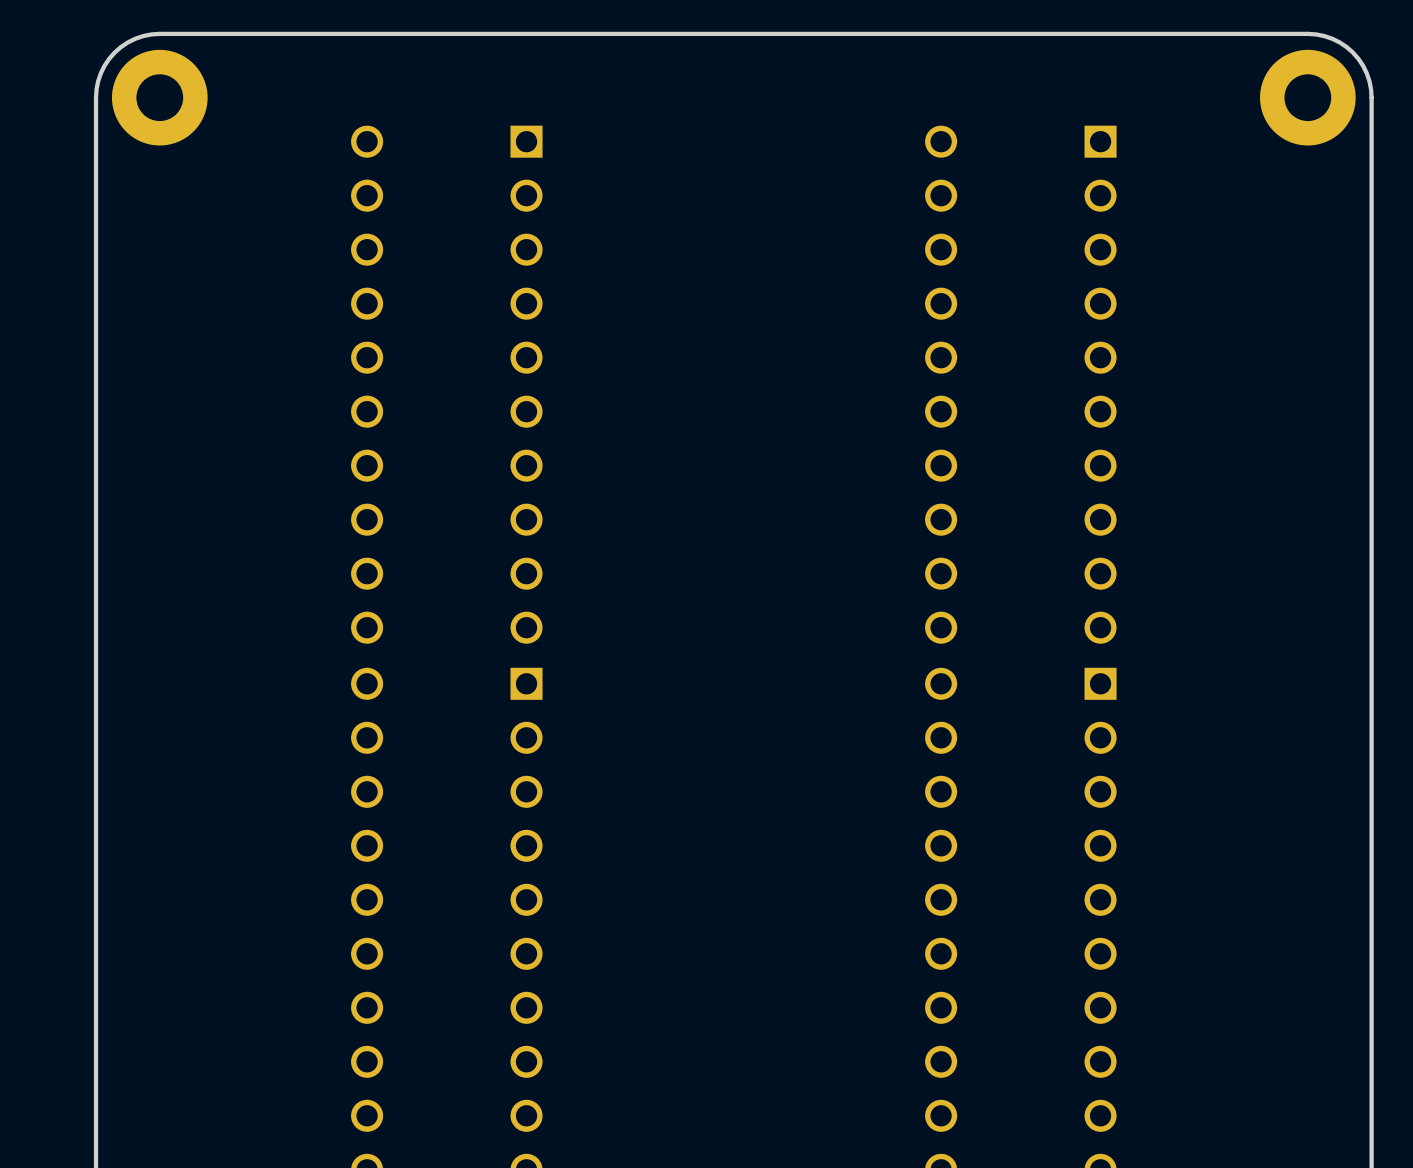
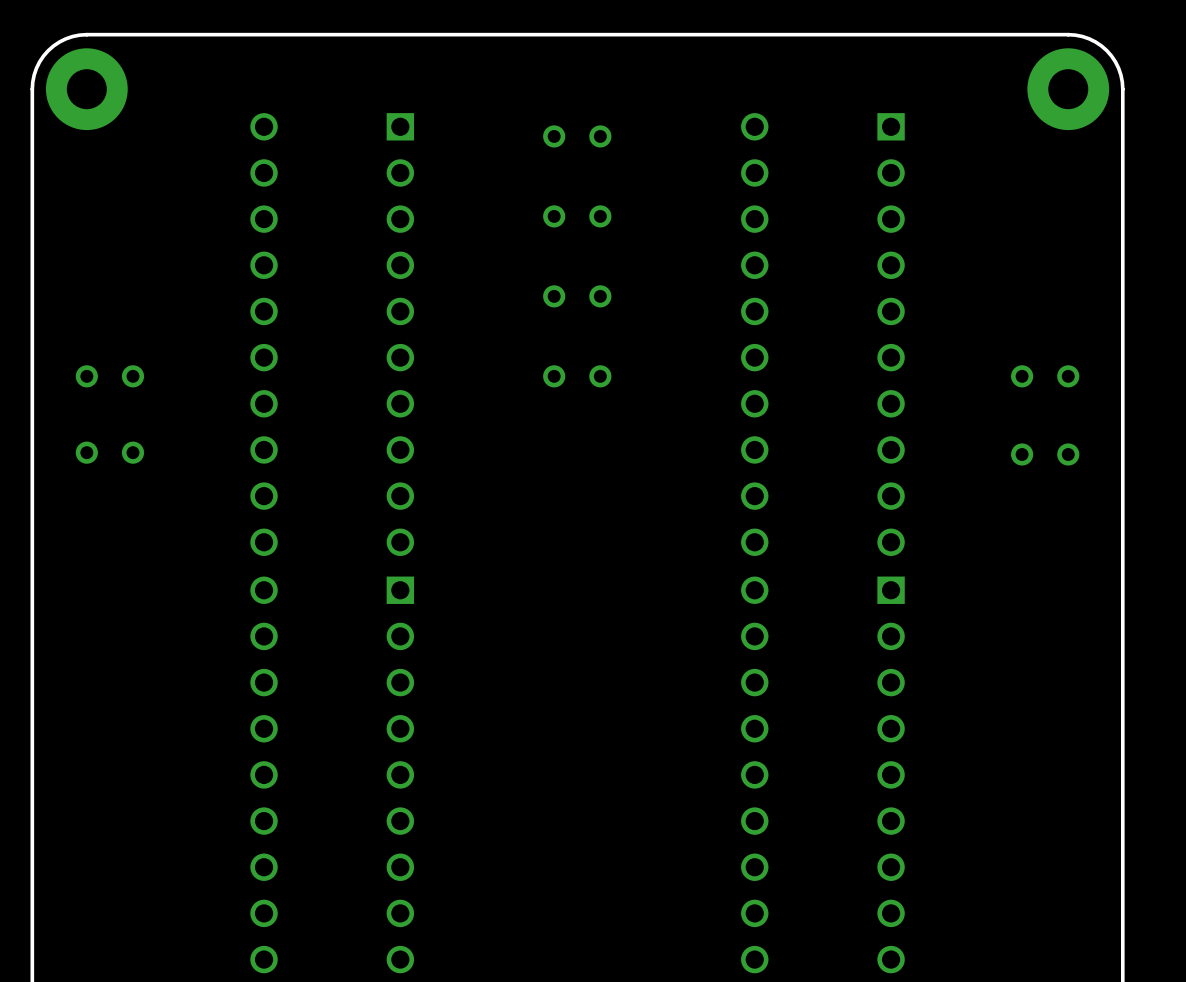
part: none -> (577, 136)
part: none -> (577, 216)
part: none -> (577, 296)
part: none -> (109, 376)
part: none -> (577, 376)
part: none -> (1045, 376)
part: none -> (109, 452)
part: none -> (1045, 454)

